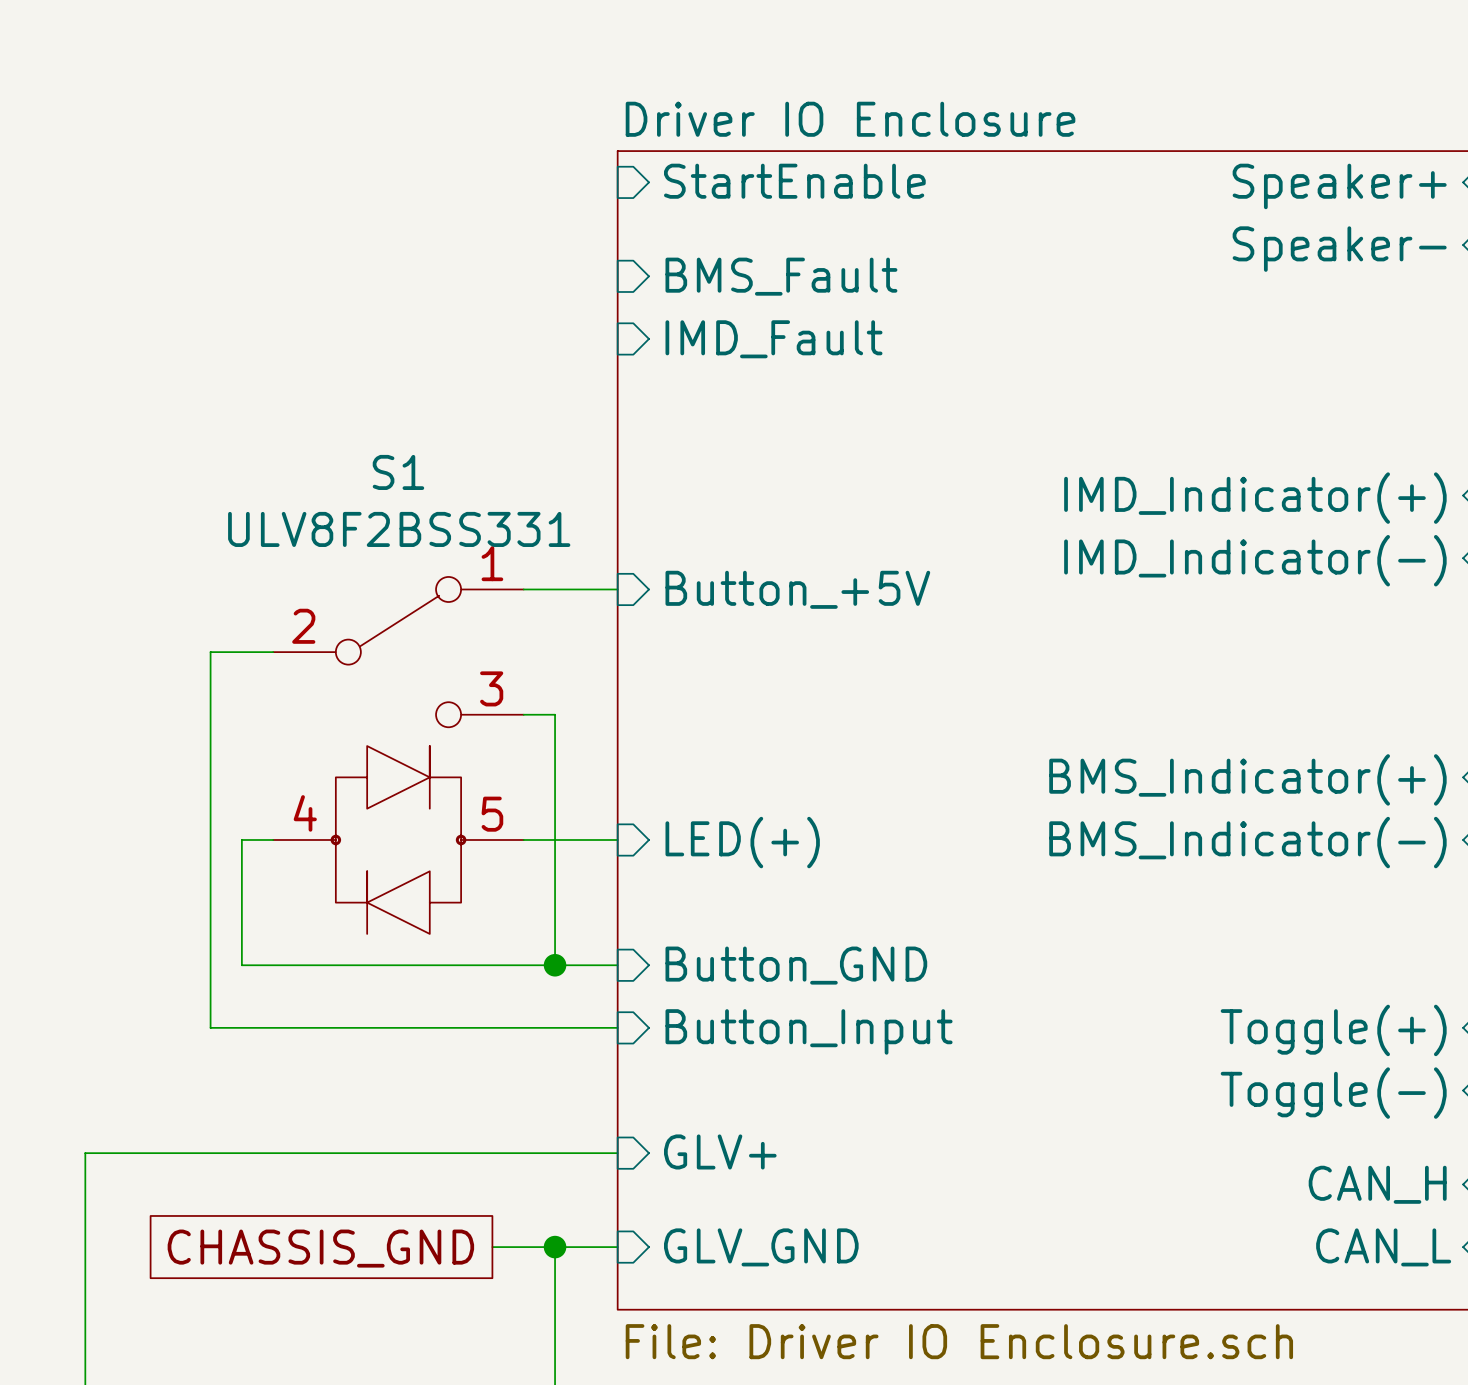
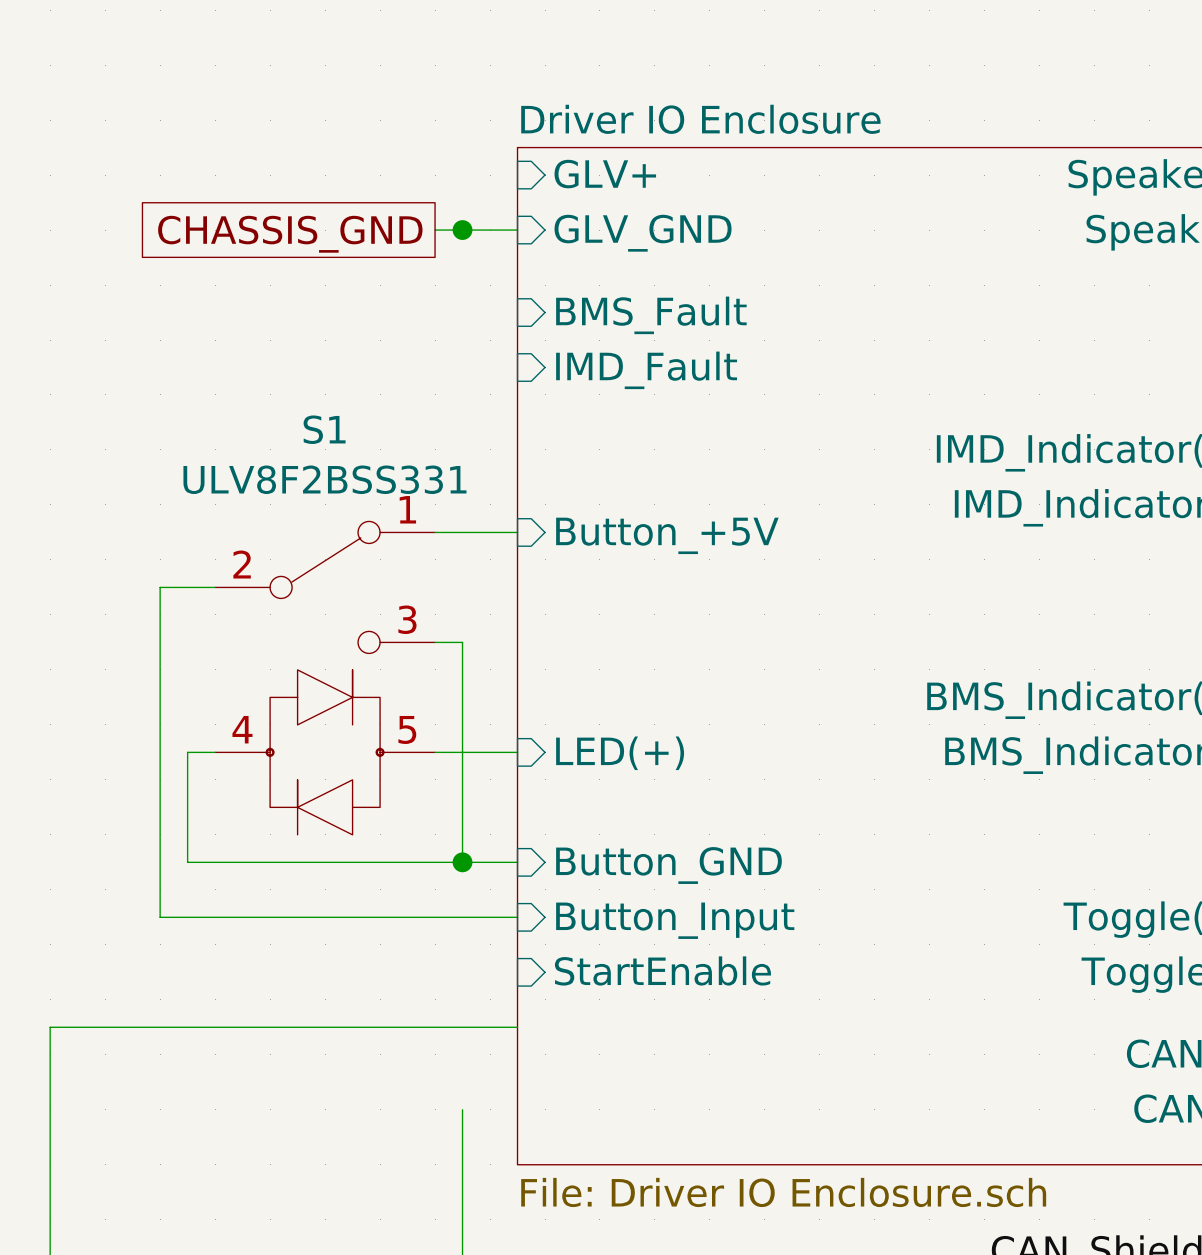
sheet pin: StartEnable (794, 181) -> GLV+ (605, 174)
wire: none -> (435, 230) (517, 230)
junction: none -> (462, 230)
sheet pin: none -> GLV_GND (643, 233)
global label: none -> CHASSIS_GND (290, 234)
sheet pin: BMS_Fault (781, 276) -> none
sheet pin: IMD_Fault (773, 339) -> BMS_Fault (651, 315)
sheet pin: none -> IMD_Fault (646, 370)
sheet pin: none -> StartEnable (662, 970)
sheet pin: GLV+ (720, 1151) -> none
wire: (492, 1247) (617, 1247) -> none
junction: (555, 1247) -> none
sheet pin: GLV_GND (761, 1247) -> none
global label: CHASSIS_GND (320, 1248) -> none

